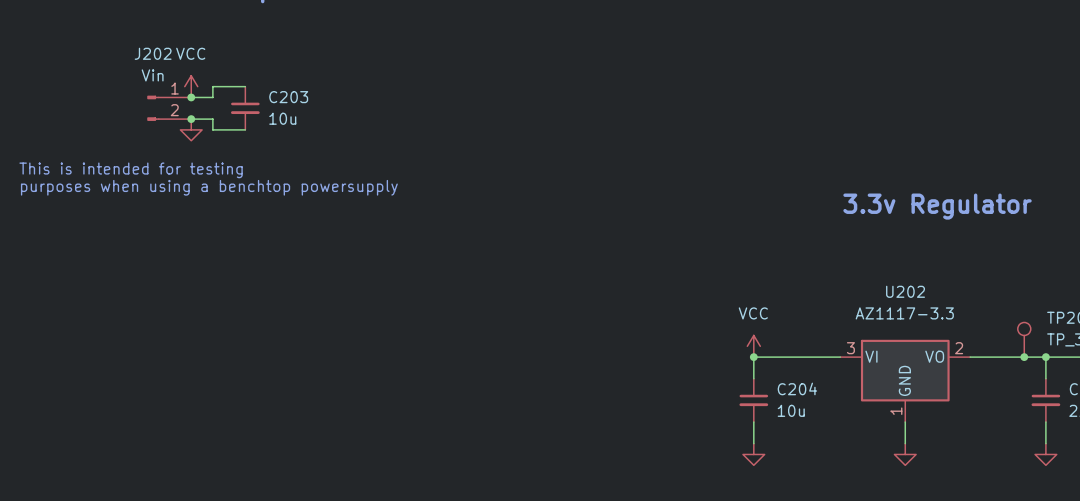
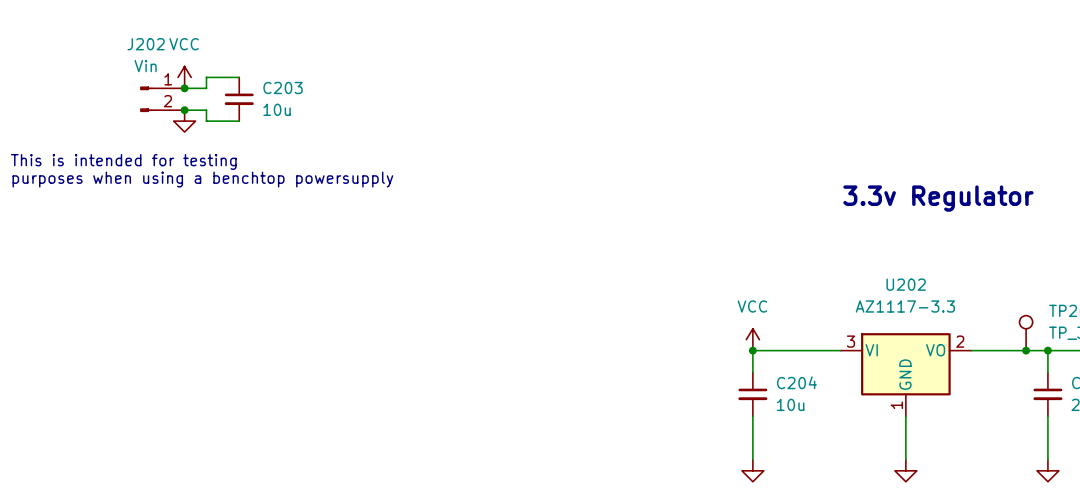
power symbol position: (753, 454) -> (752, 470)
power symbol position: (905, 454) -> (905, 470)
power symbol position: (1045, 454) -> (1047, 470)

